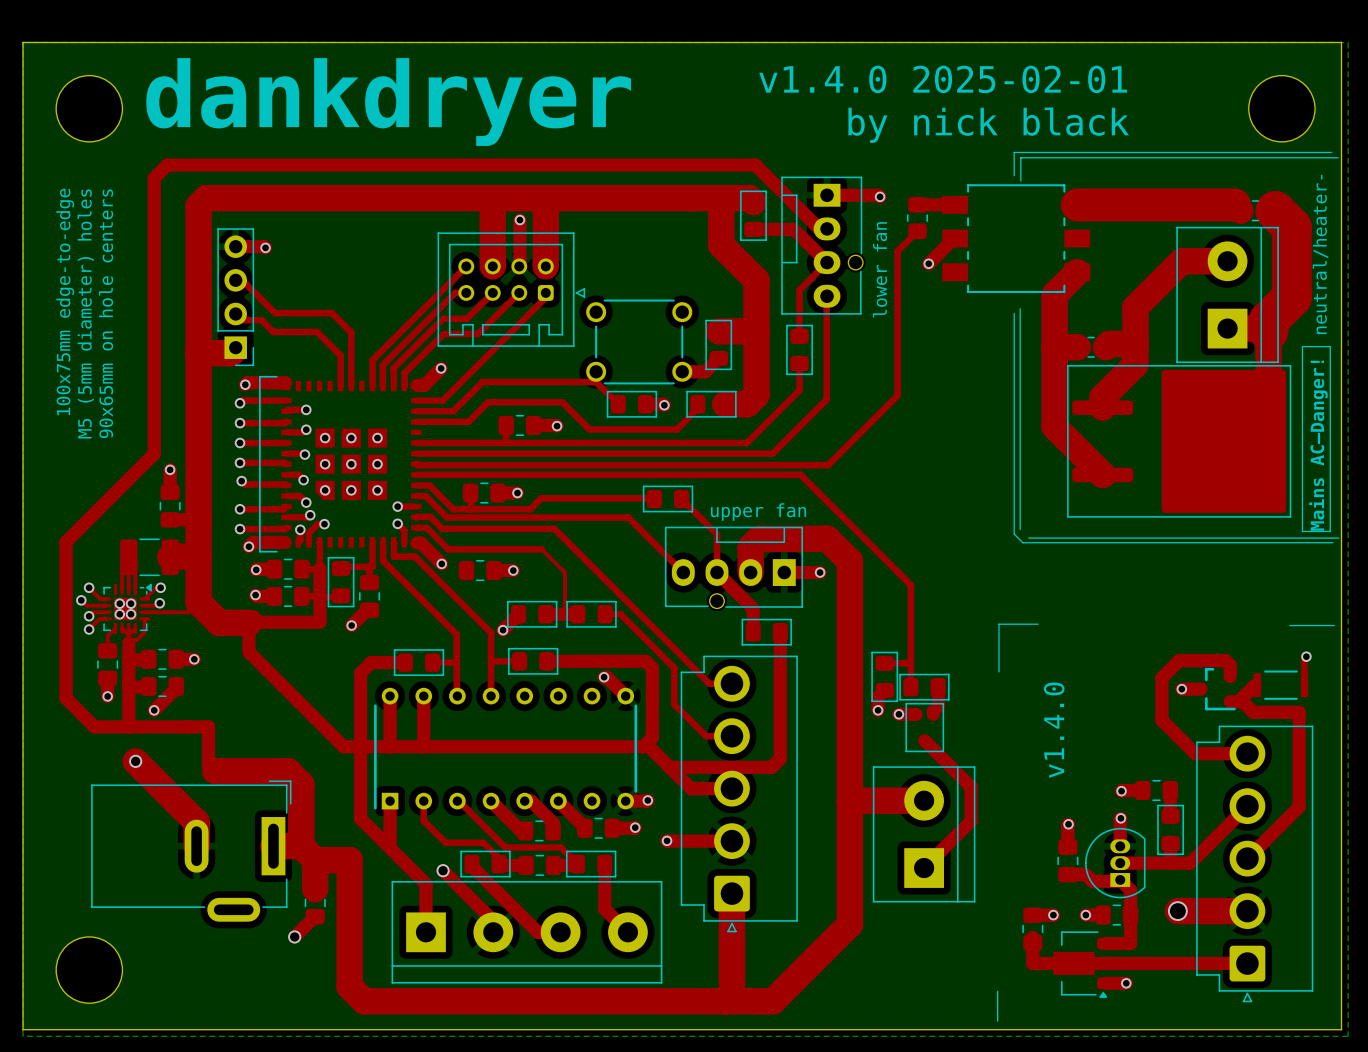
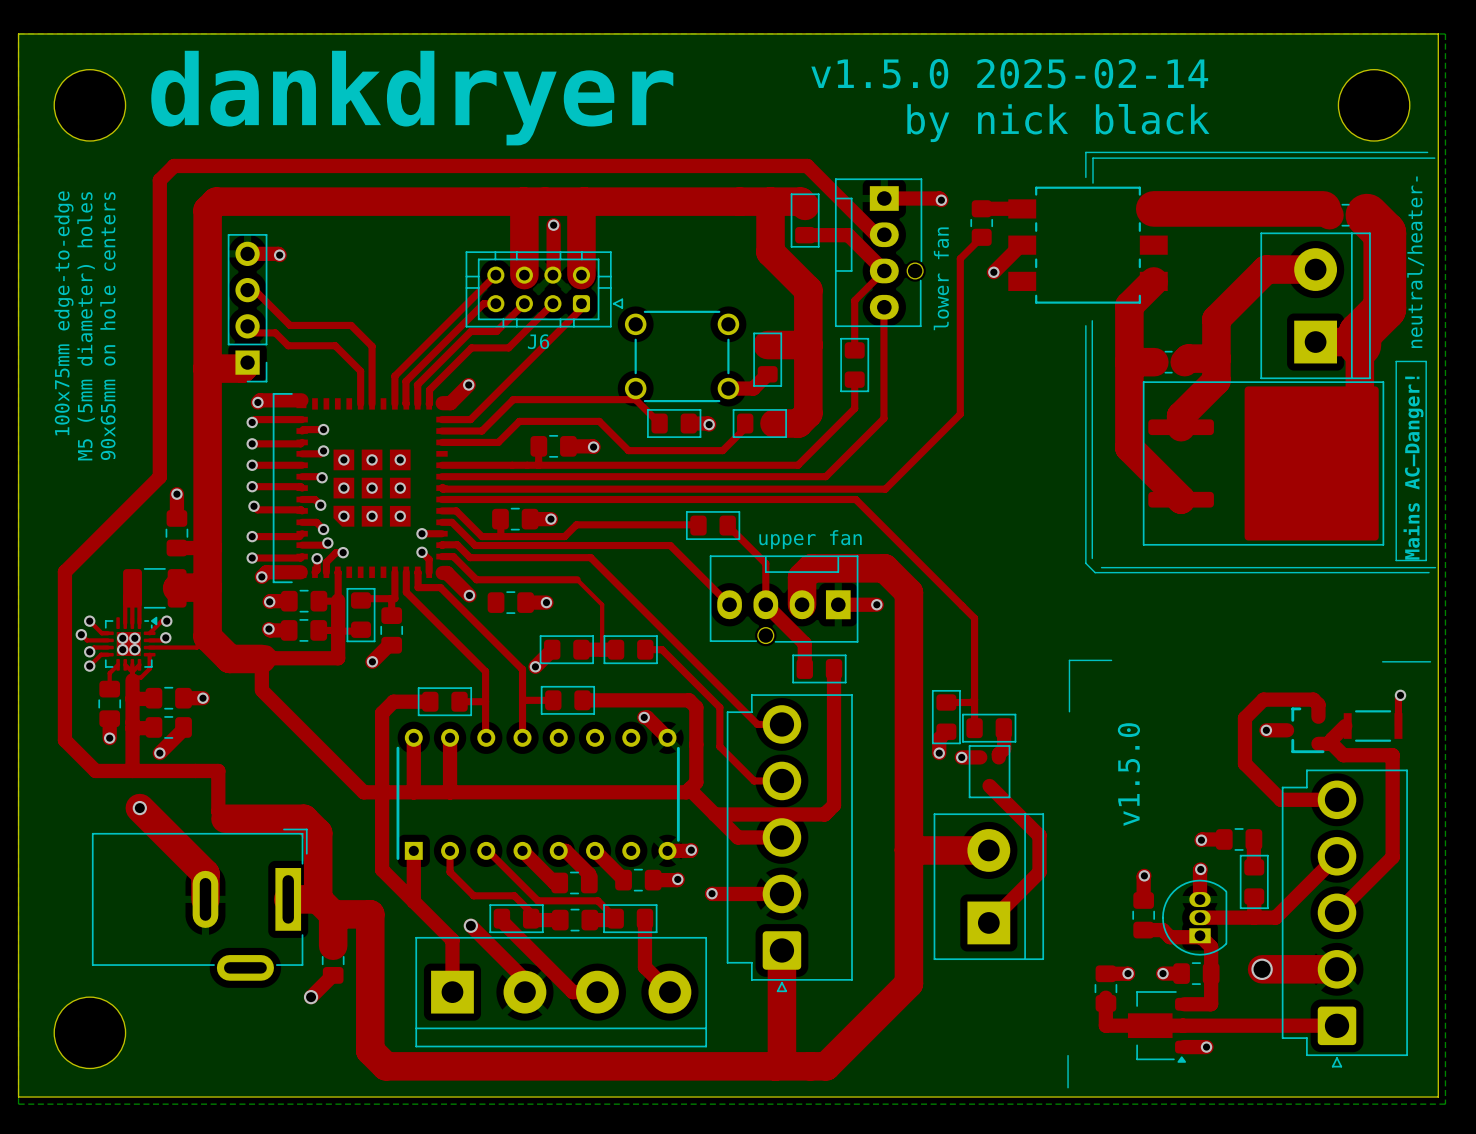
text: v1.4.0 2025-02-01 (943, 79) -> v1.5.0 2025-02-14 (1009, 73)
J6: none -> (544, 289)
part: (511, 289) -> none
text: v1.4.0 (1054, 730) -> v1.5.0 (1128, 774)

